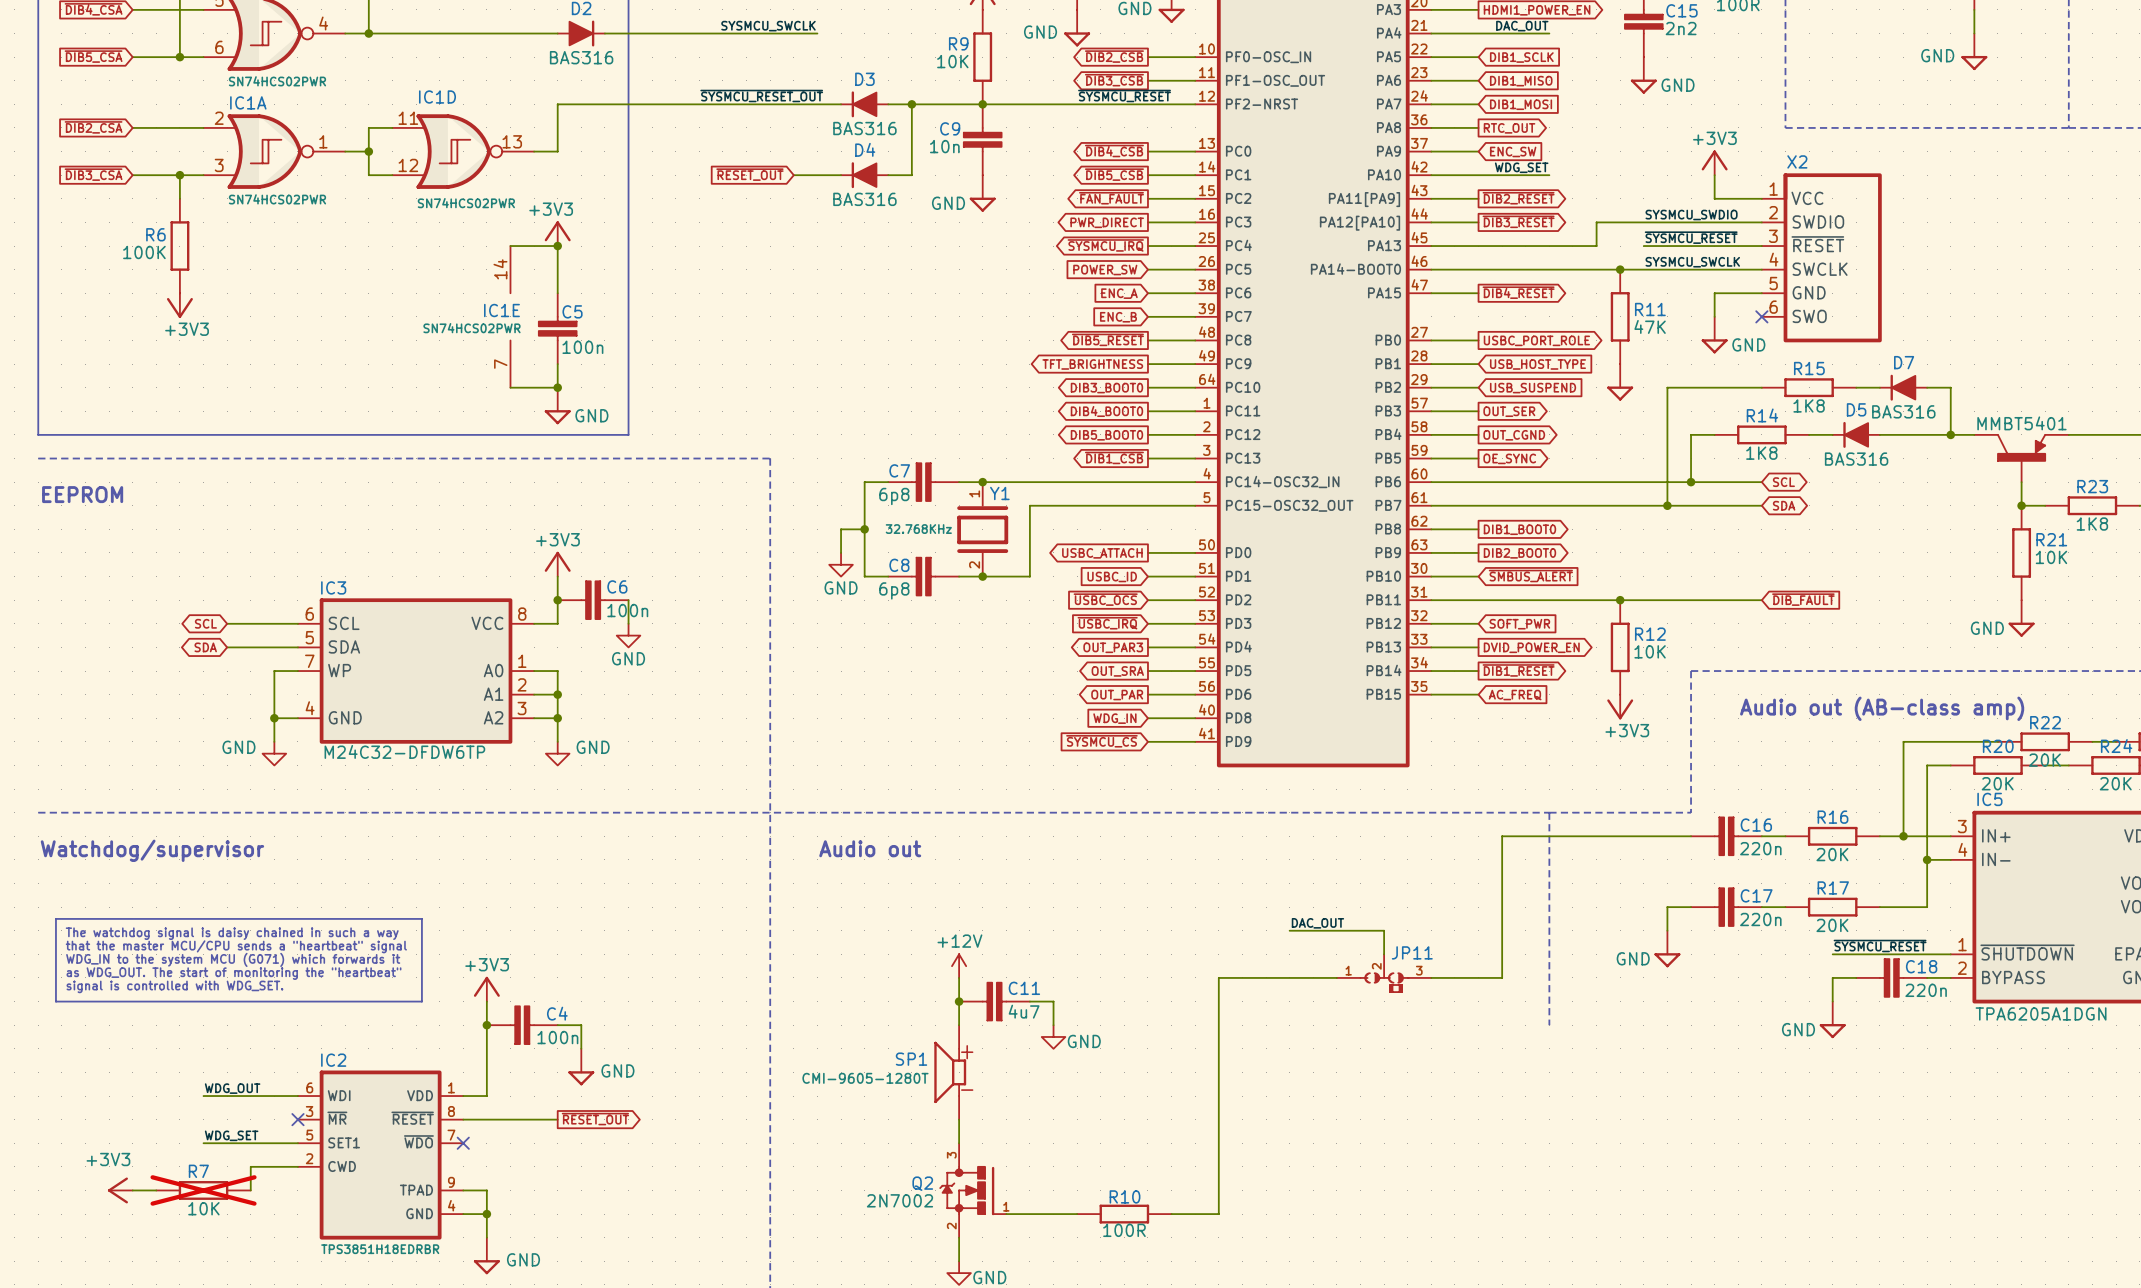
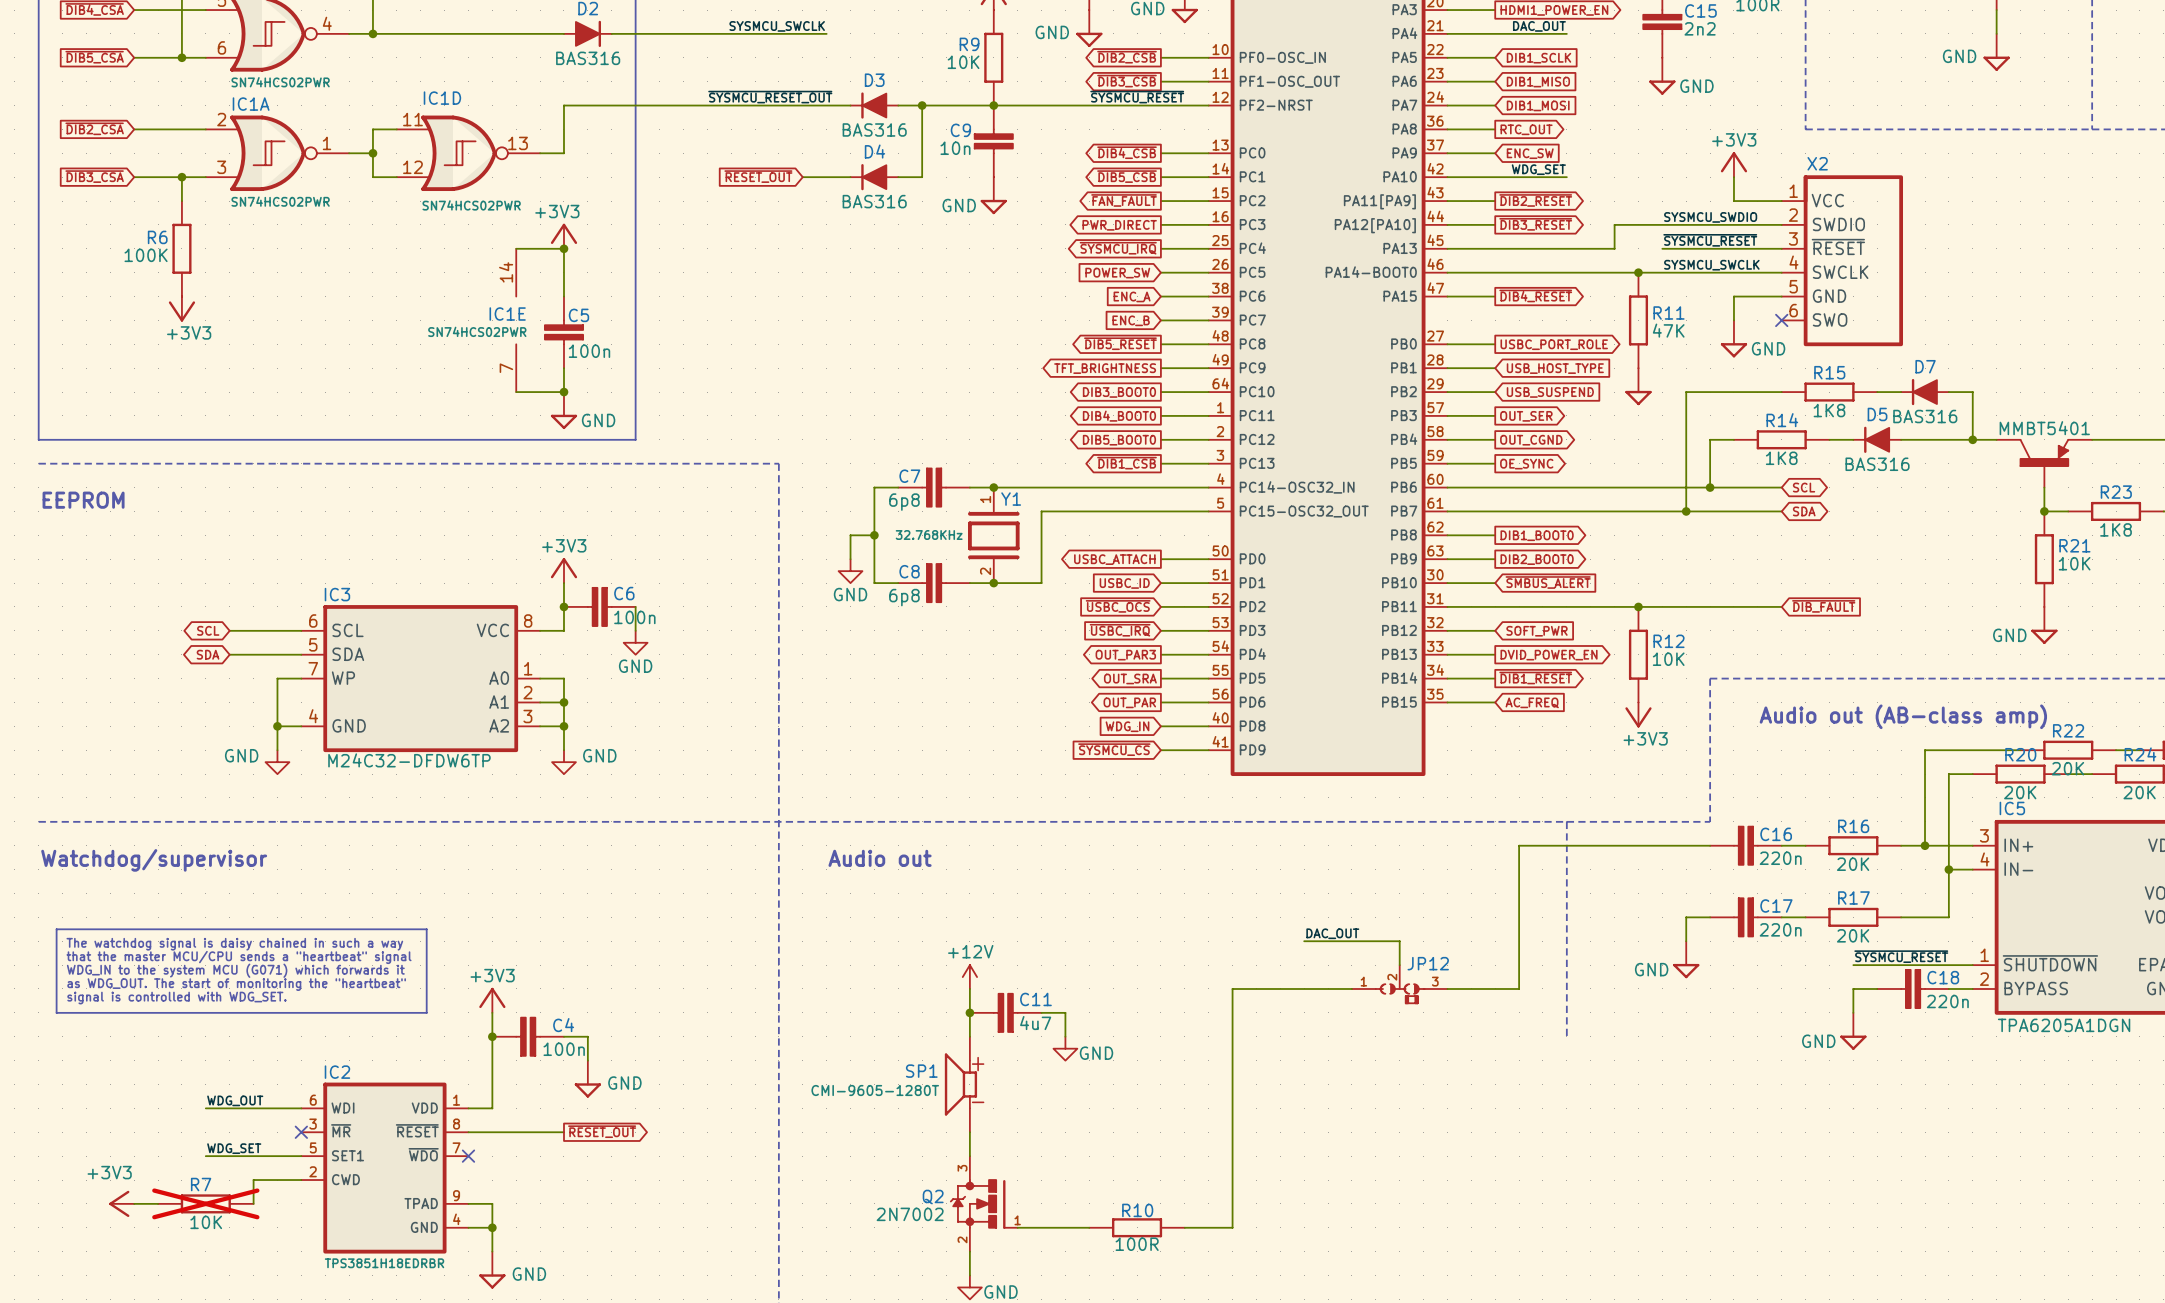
JP11 name: JP11 (1412, 952) -> JP12 (1428, 963)

